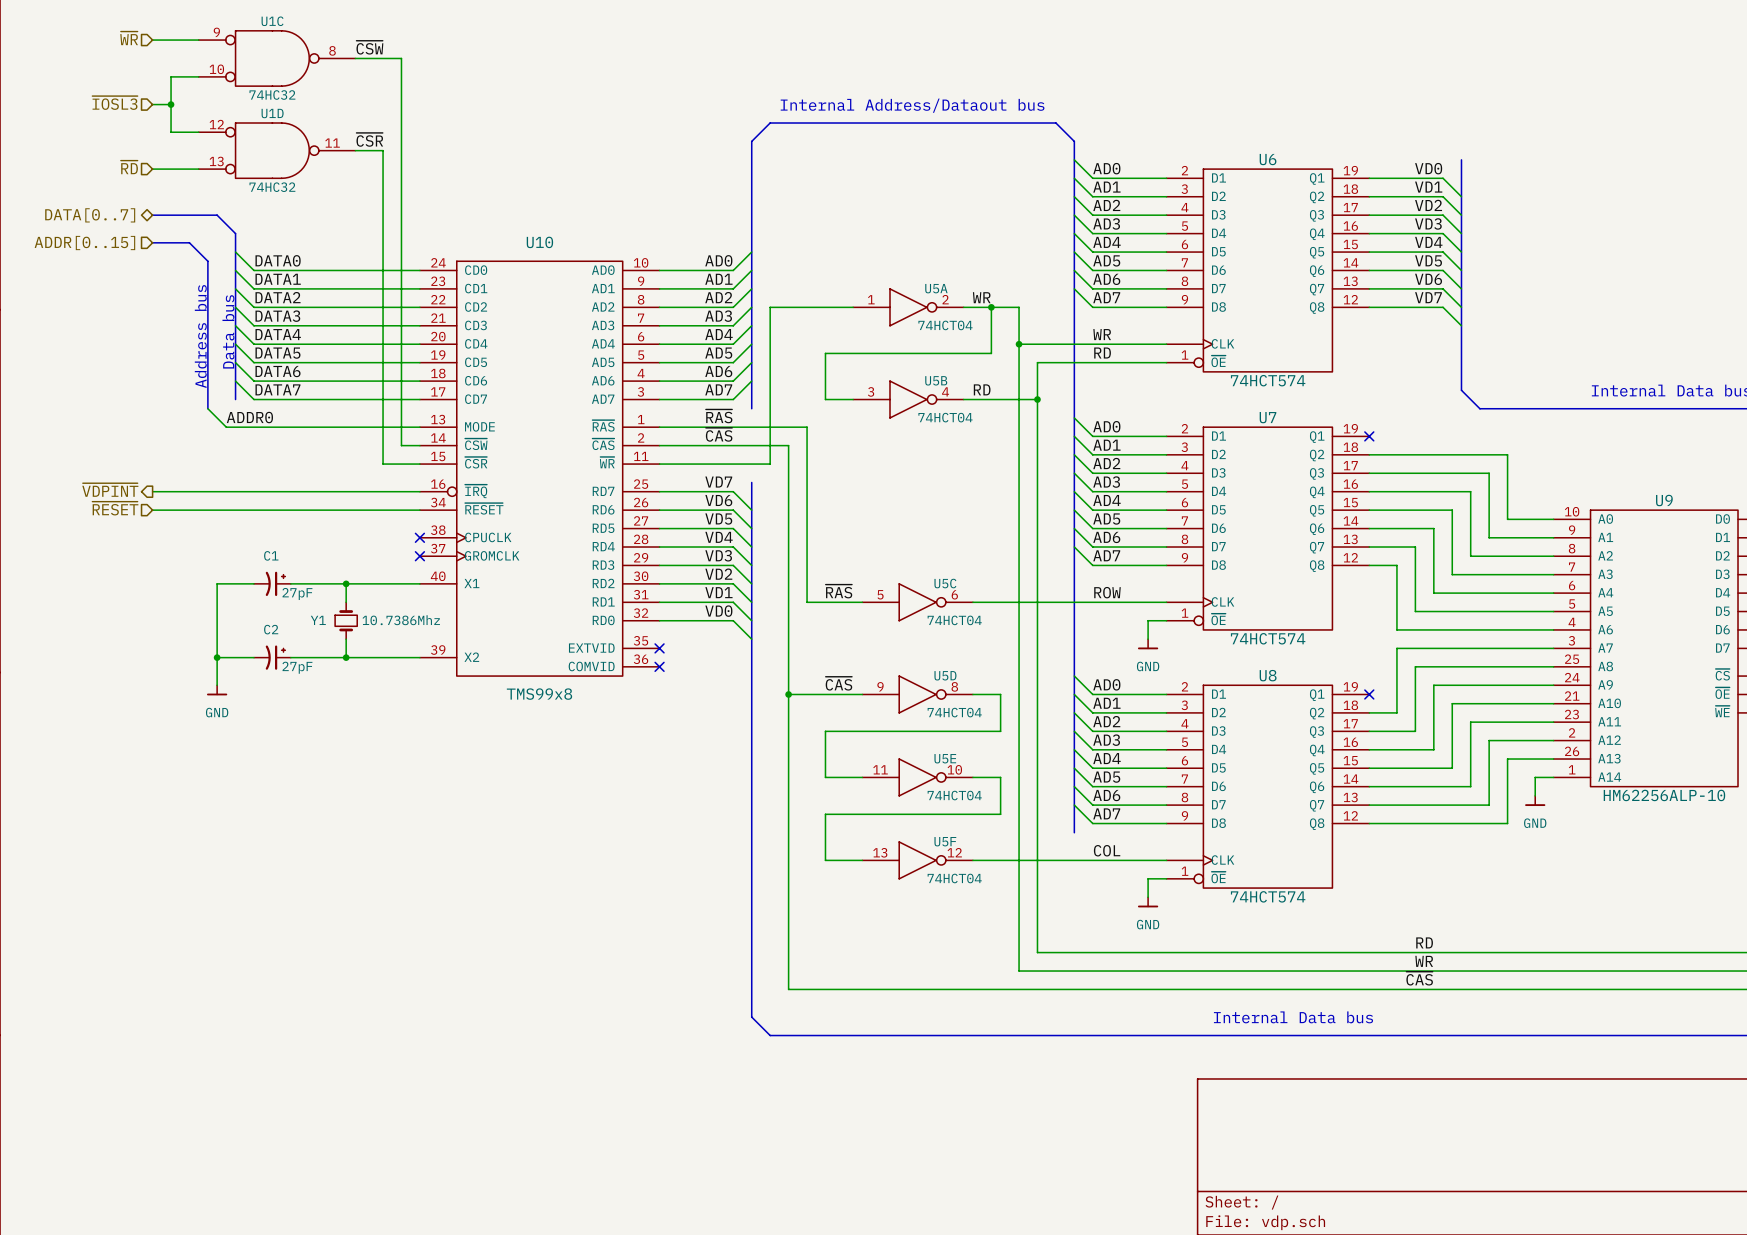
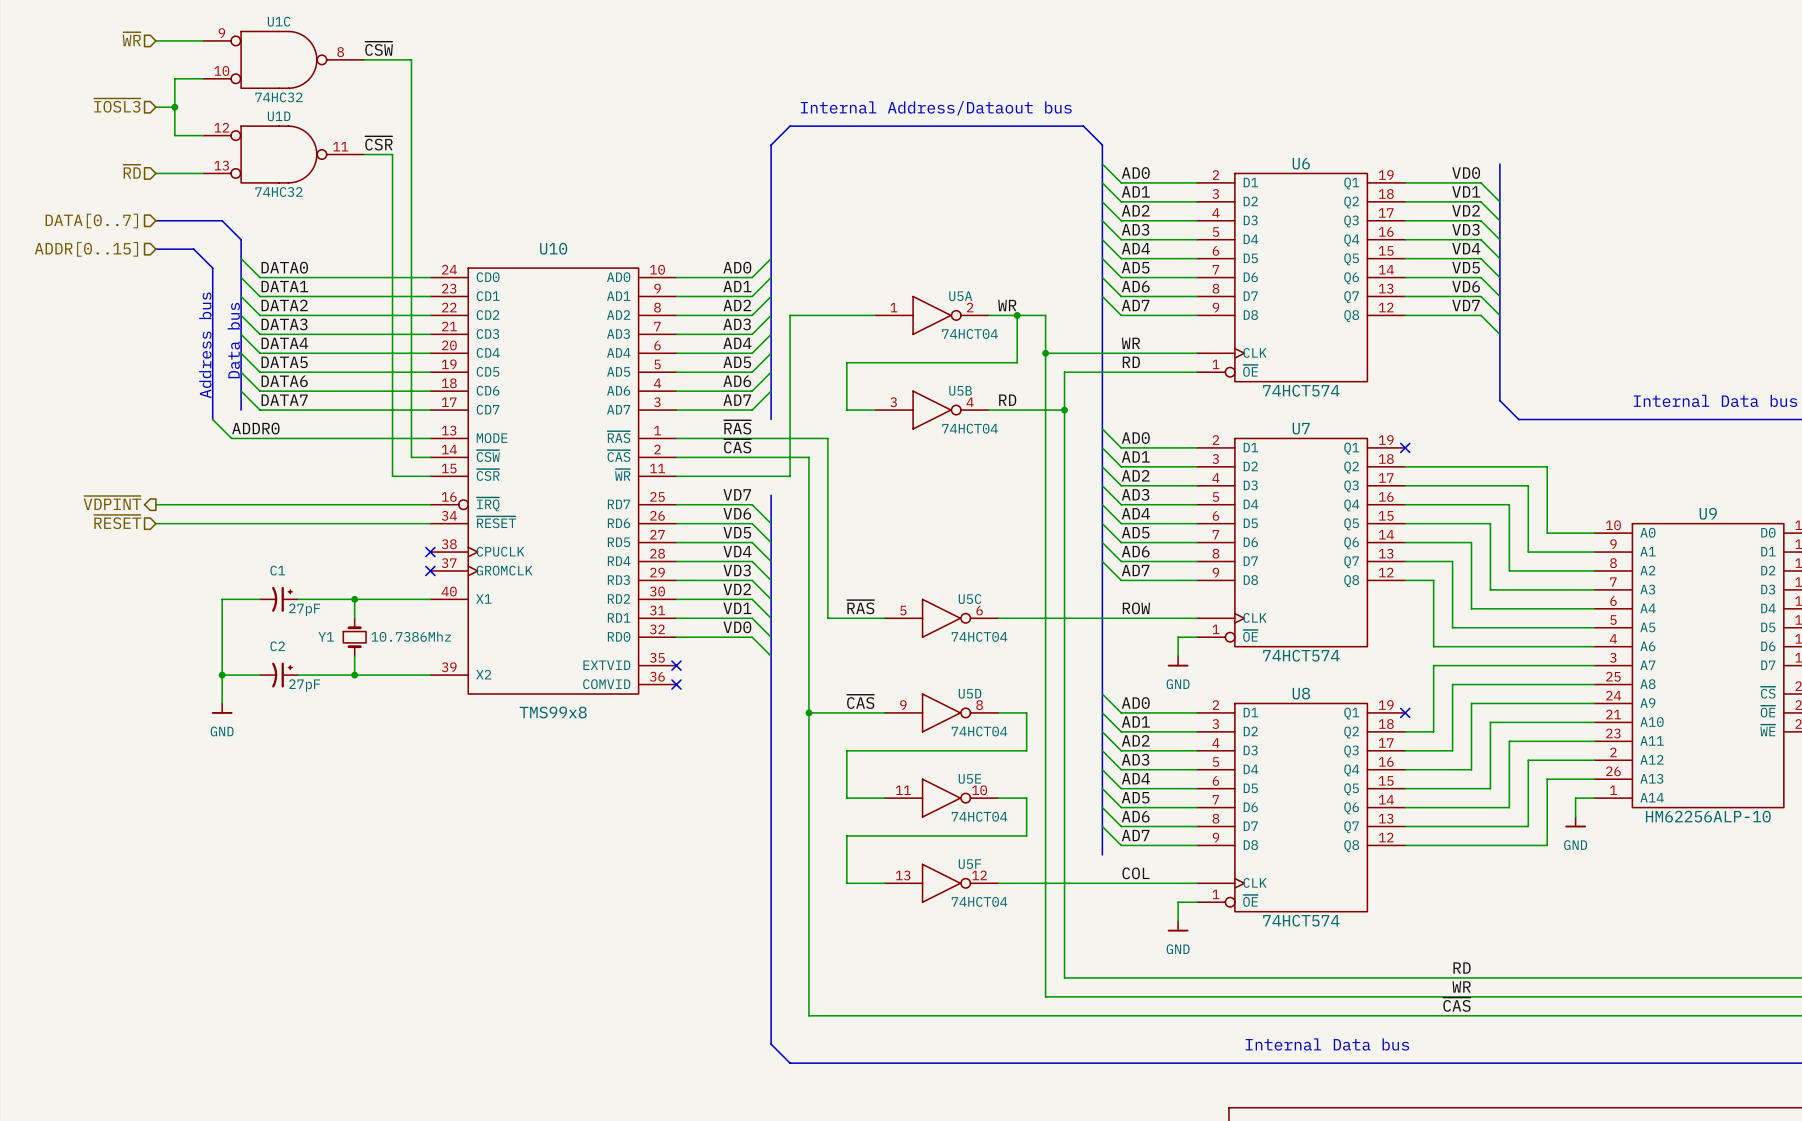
hierarchical label shape: bidirectional (90, 215) -> input (91, 220)

